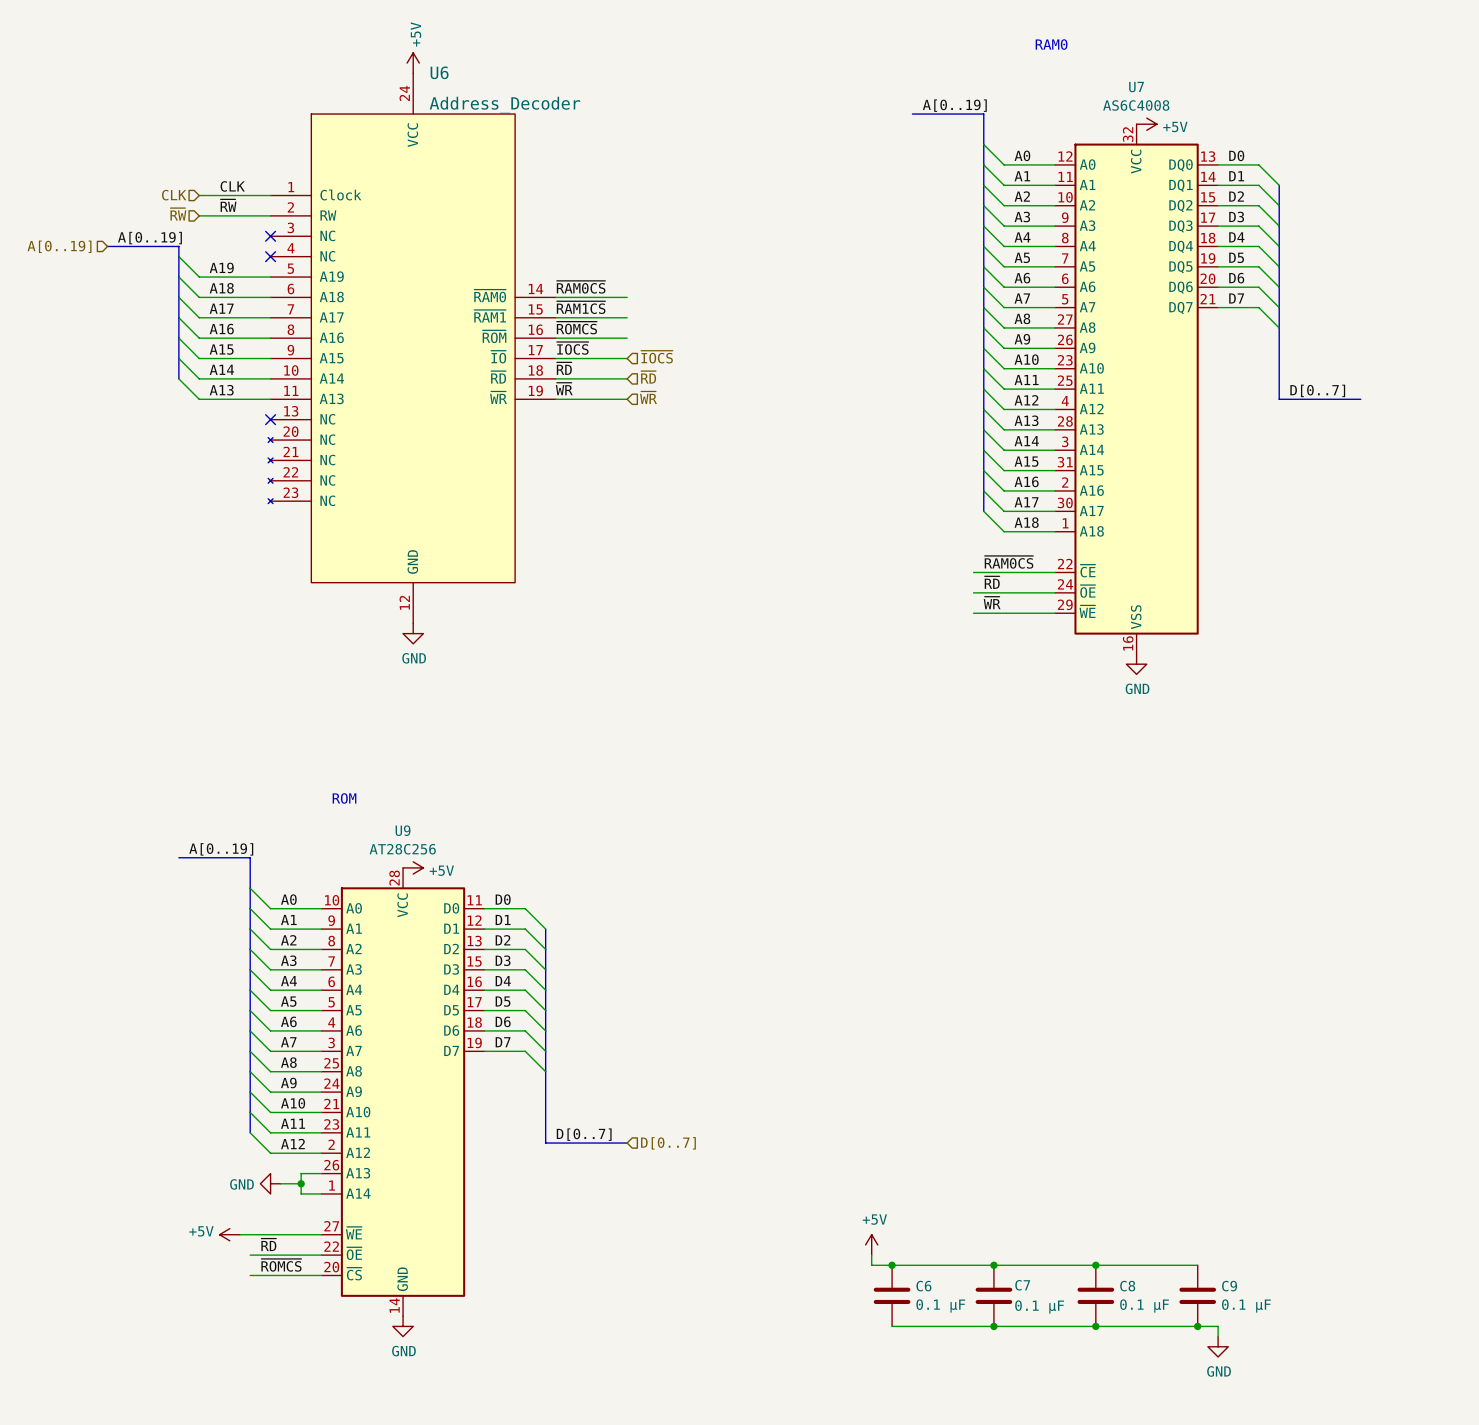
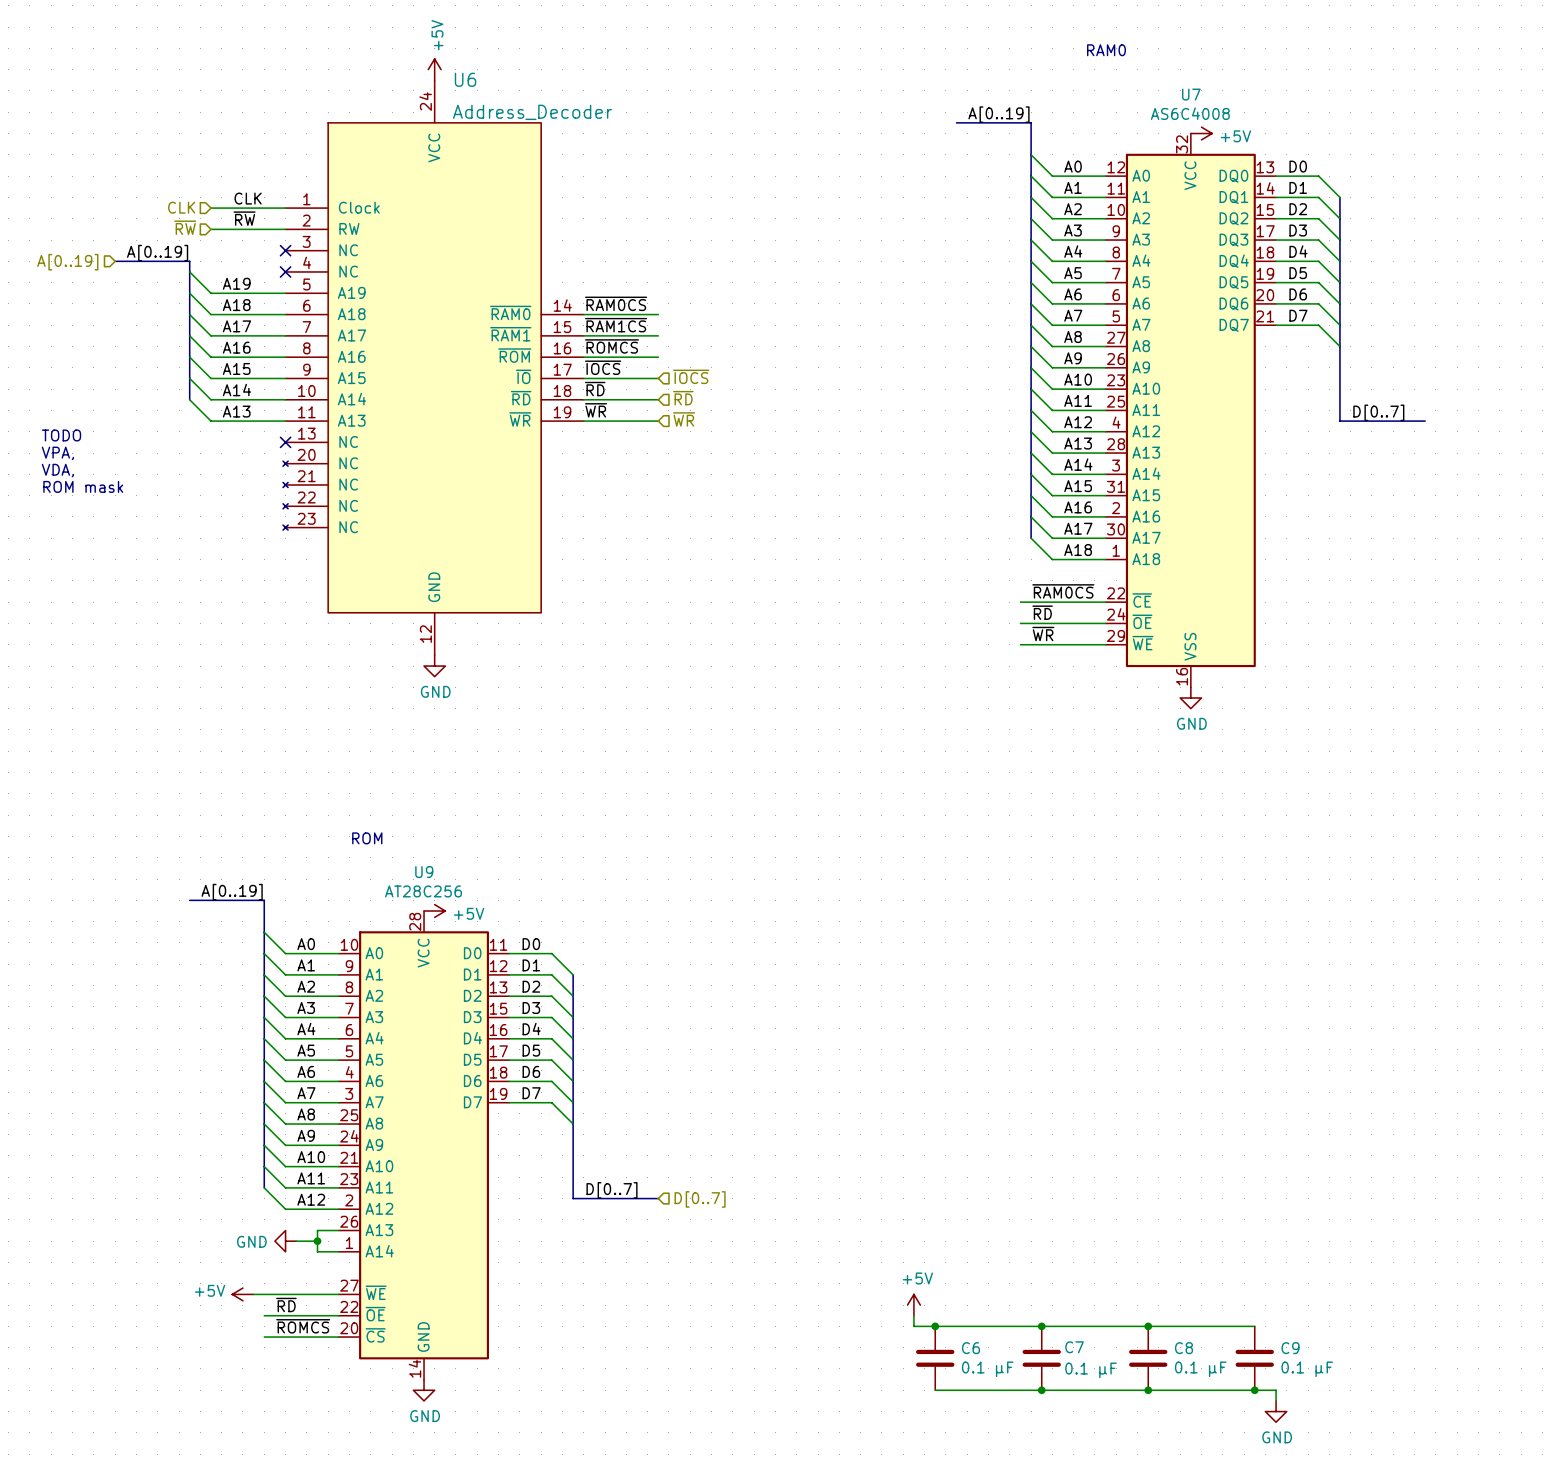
text: none -> TODO (61, 435)
text: none -> VPA, (57, 453)
text: none -> VDA, (57, 470)
text: none -> ROM mask (83, 486)

